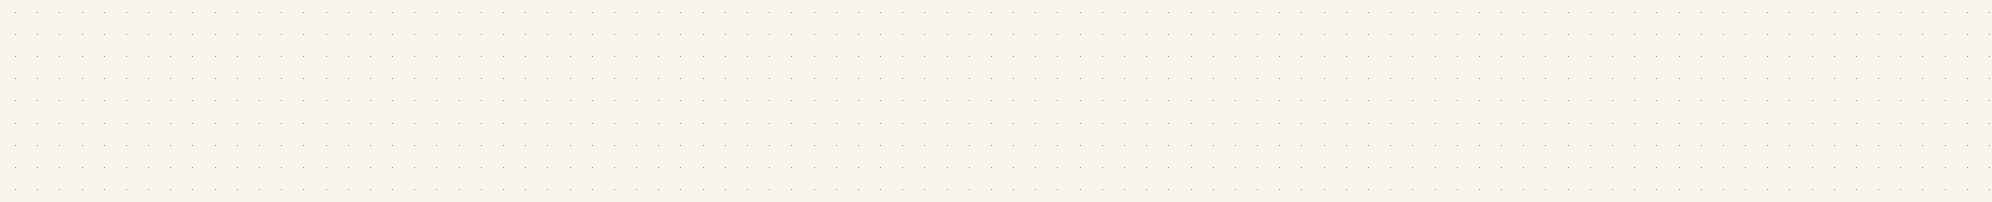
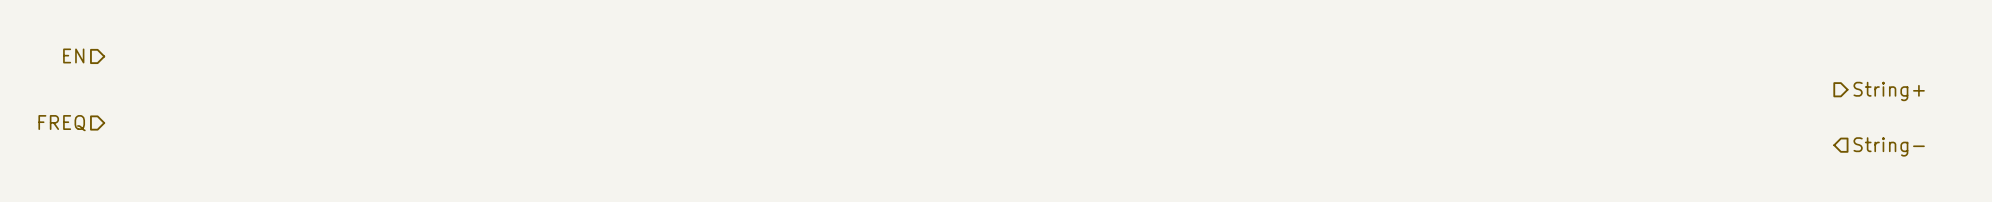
hierarchical label: none -> EN (73, 55)
hierarchical label: none -> String+ (1889, 91)
hierarchical label: none -> FREQ (62, 123)
hierarchical label: none -> String- (1889, 146)

